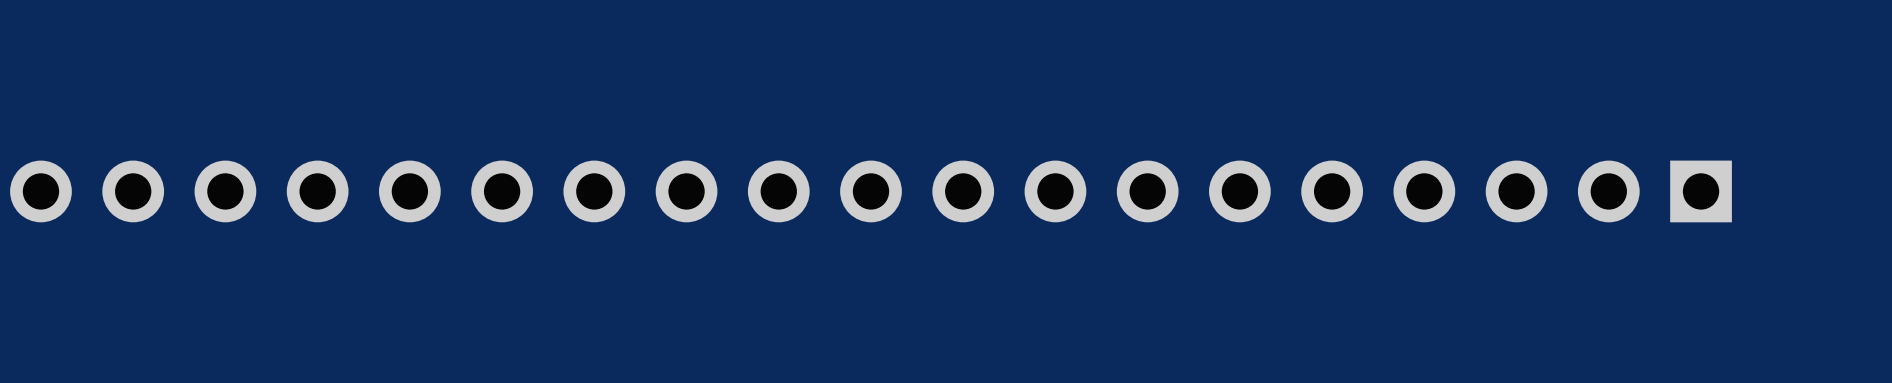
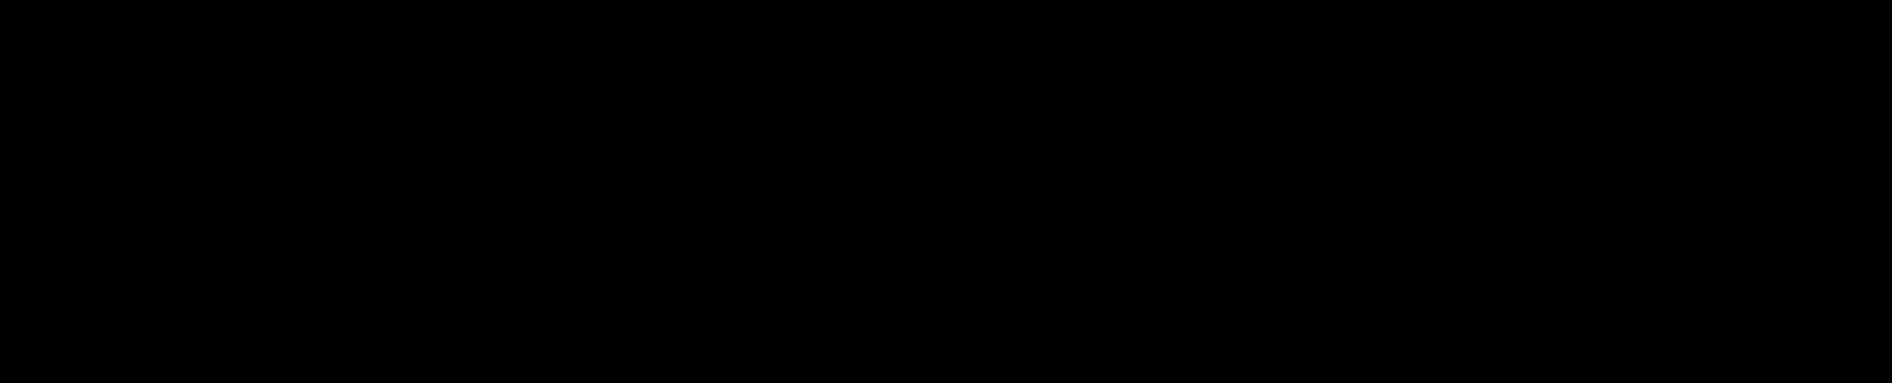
part: (871, 191) -> none

